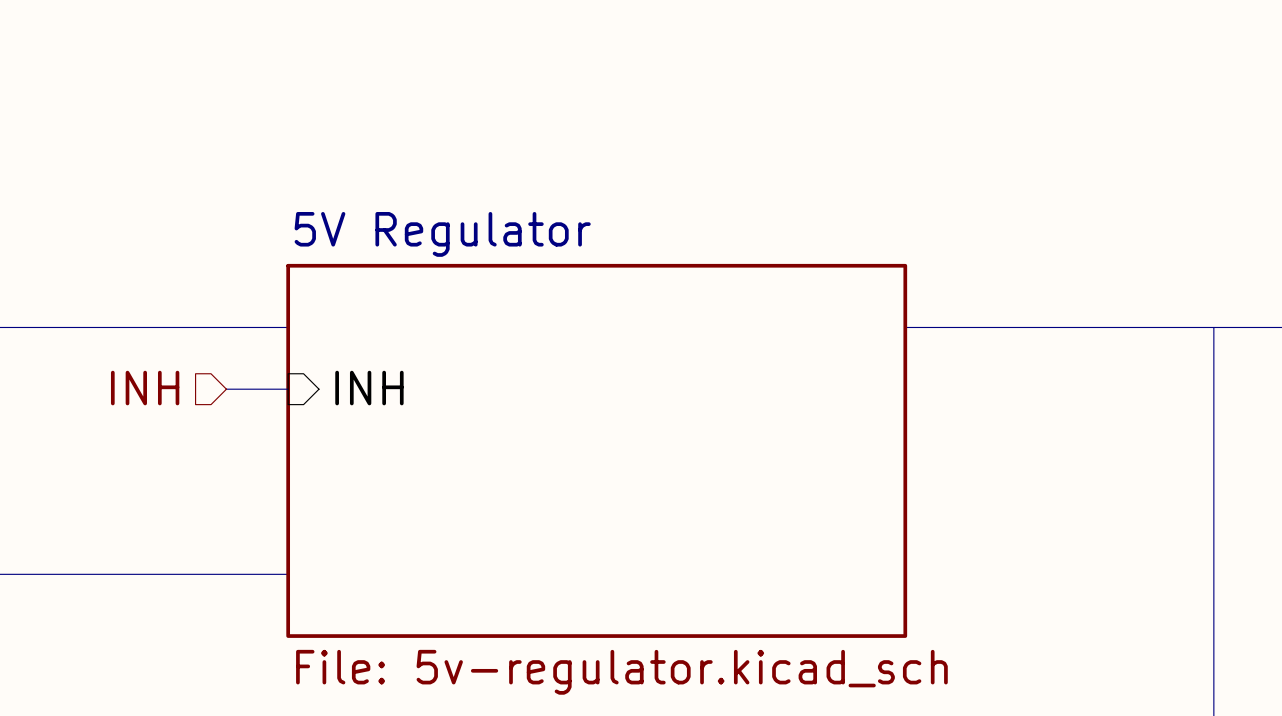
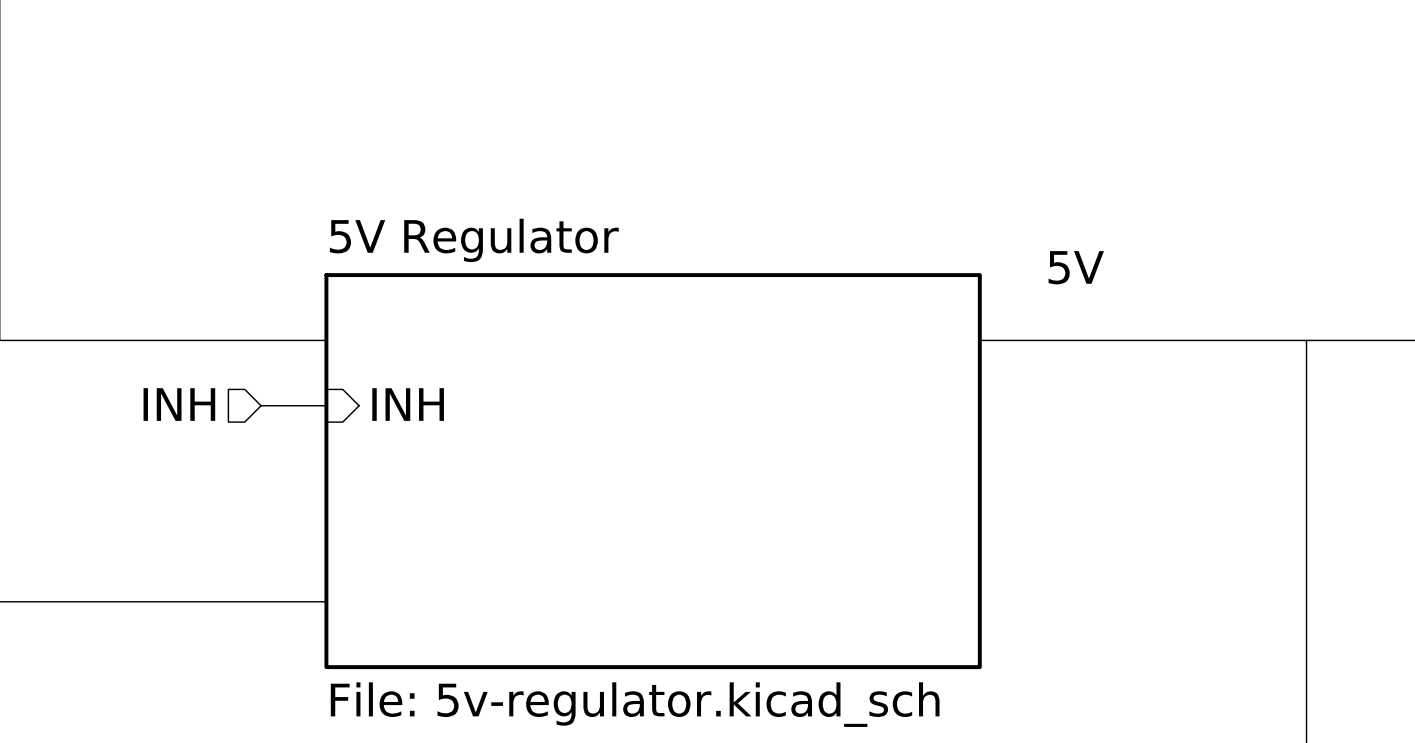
text: none -> 5V (1076, 267)

